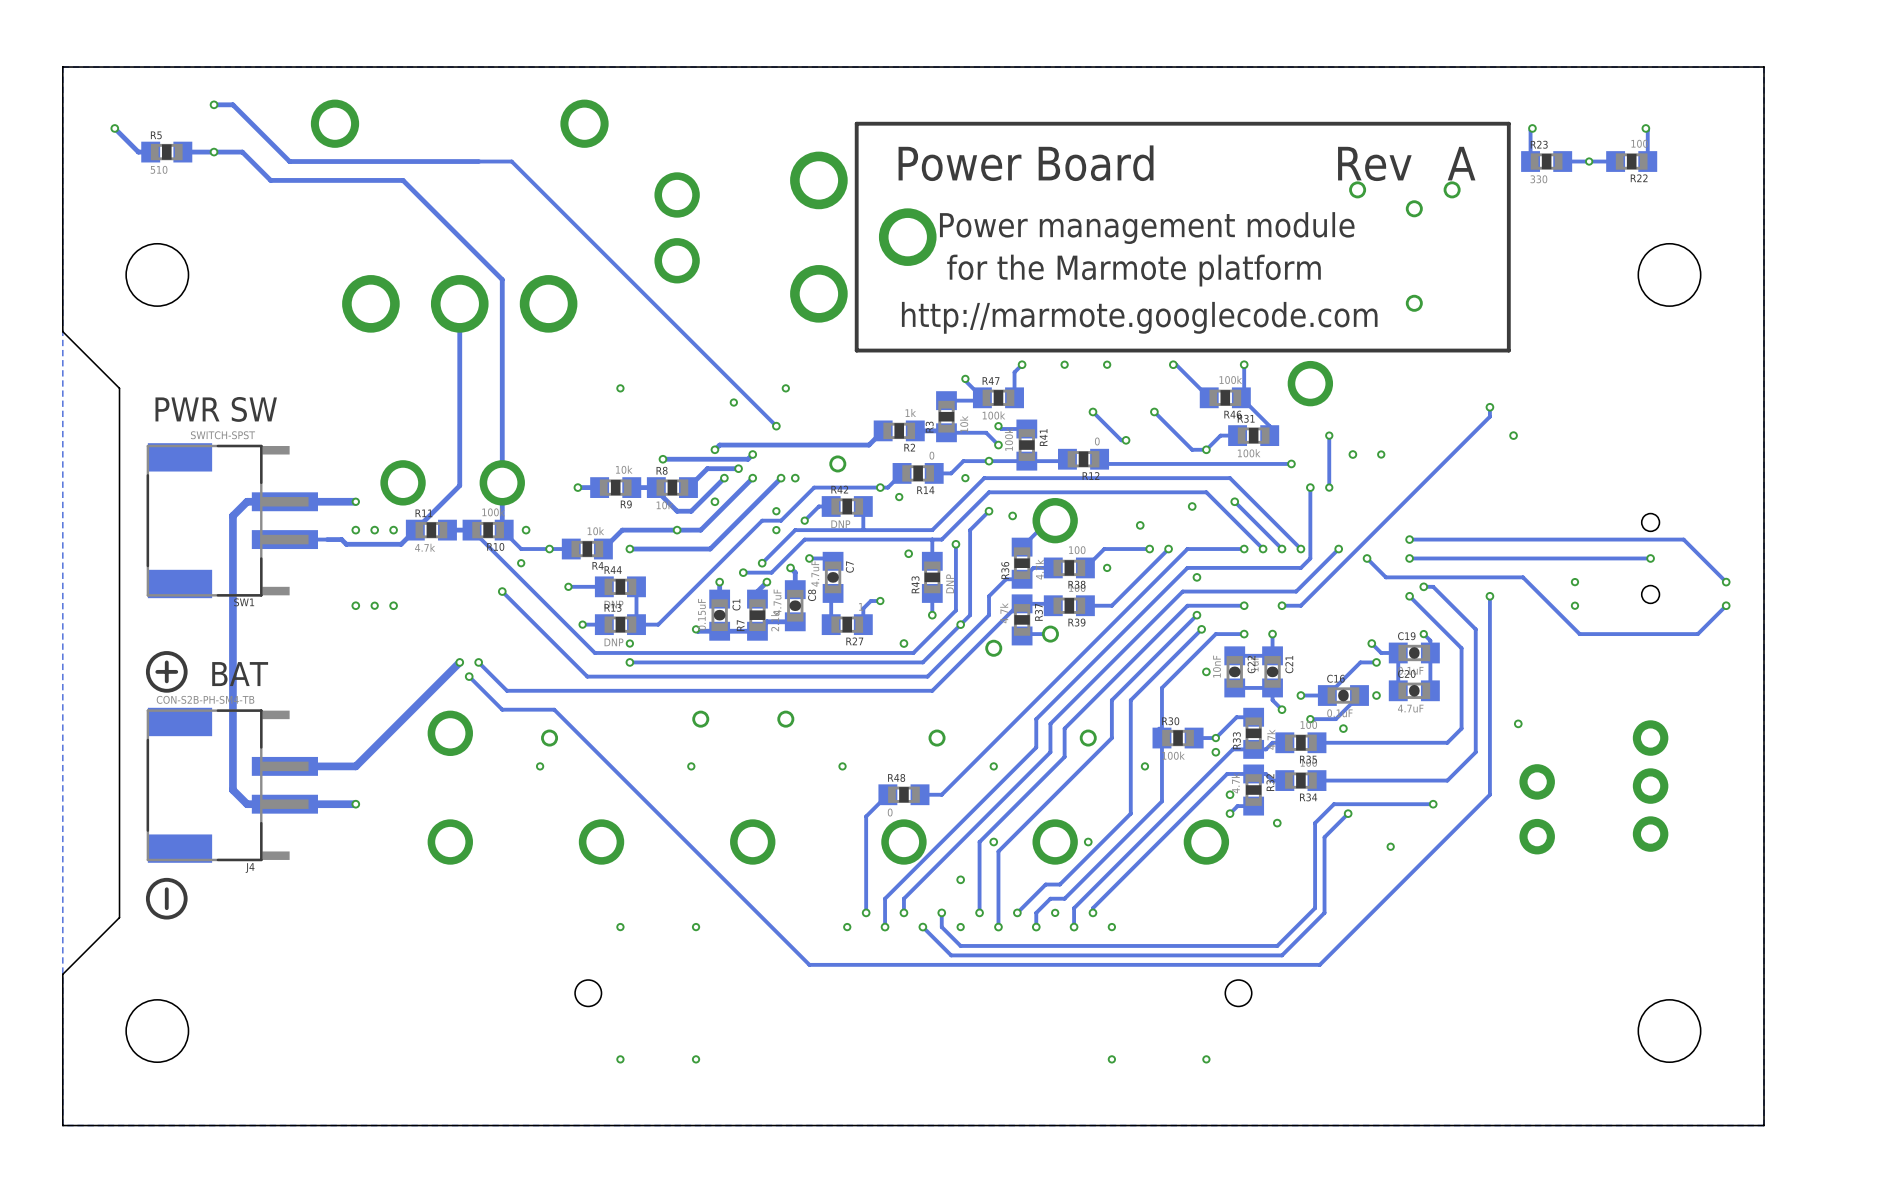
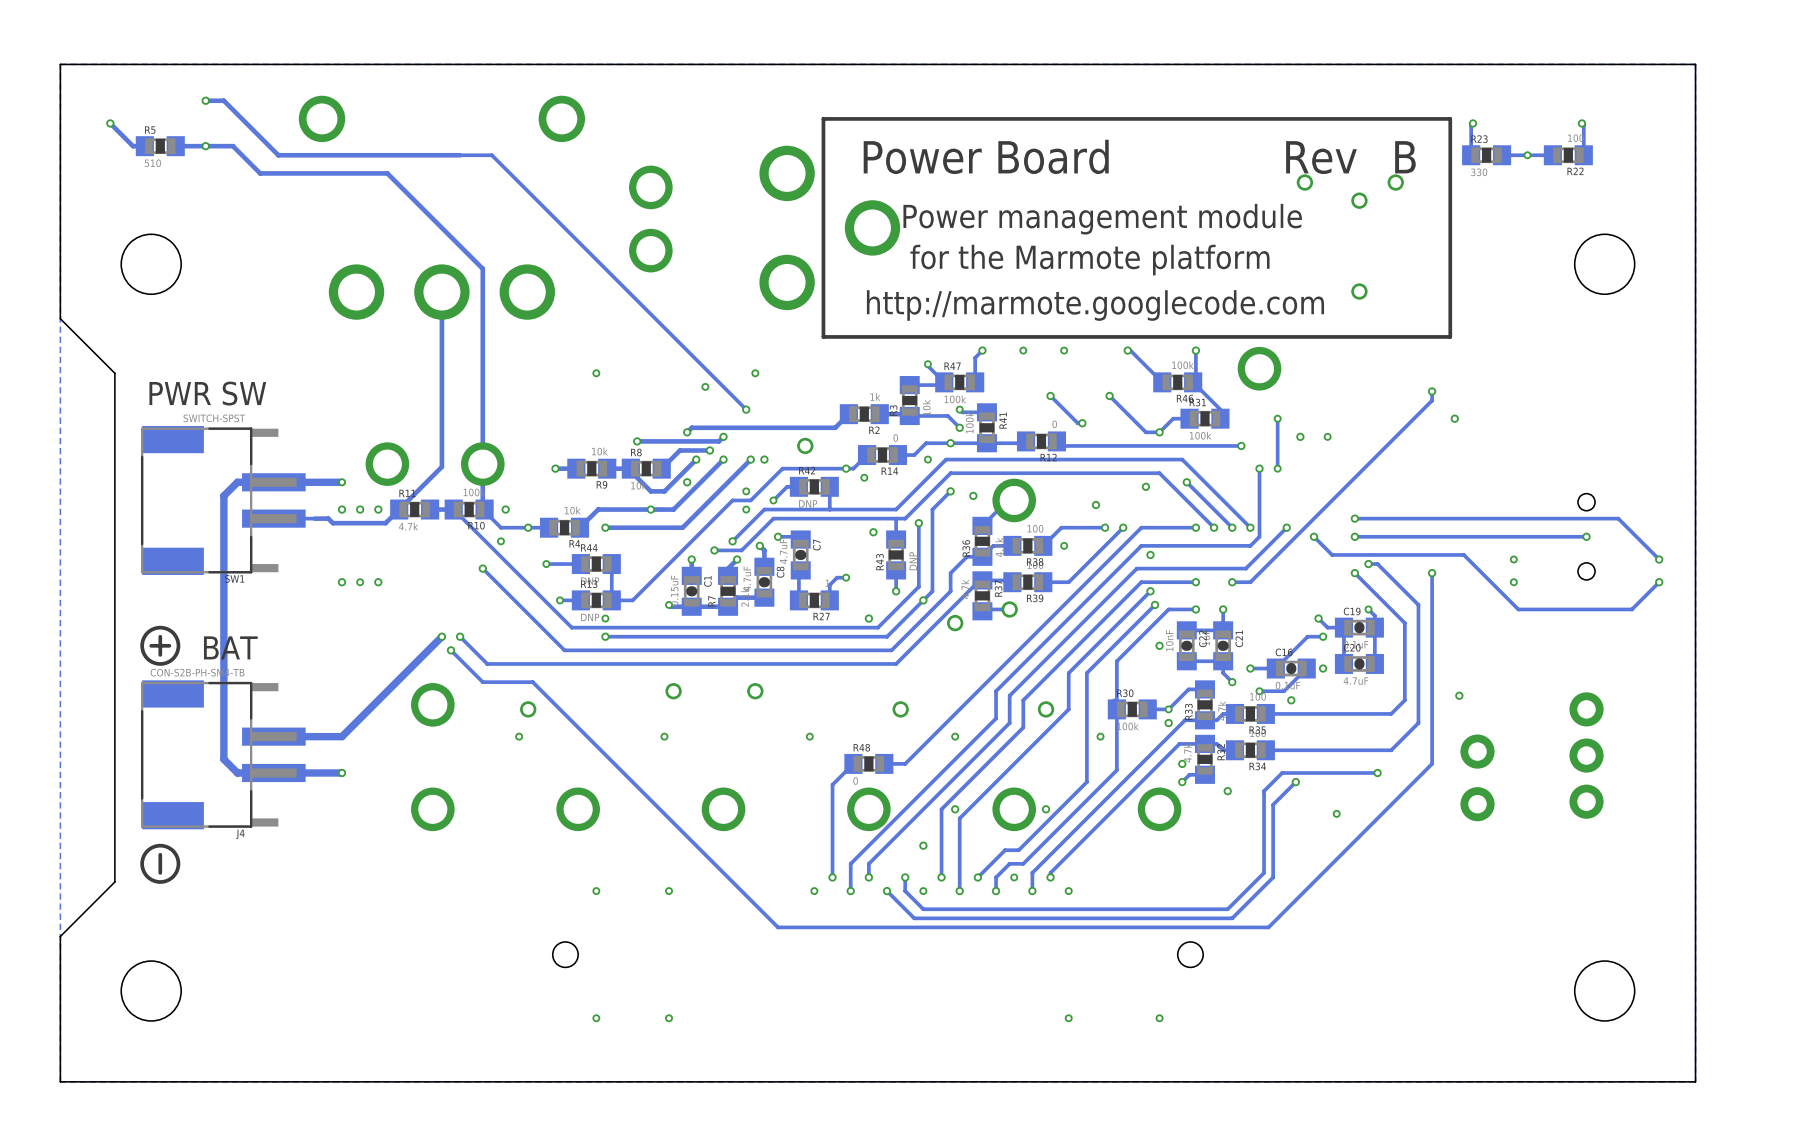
text: A (1461, 163) -> B (1405, 157)

